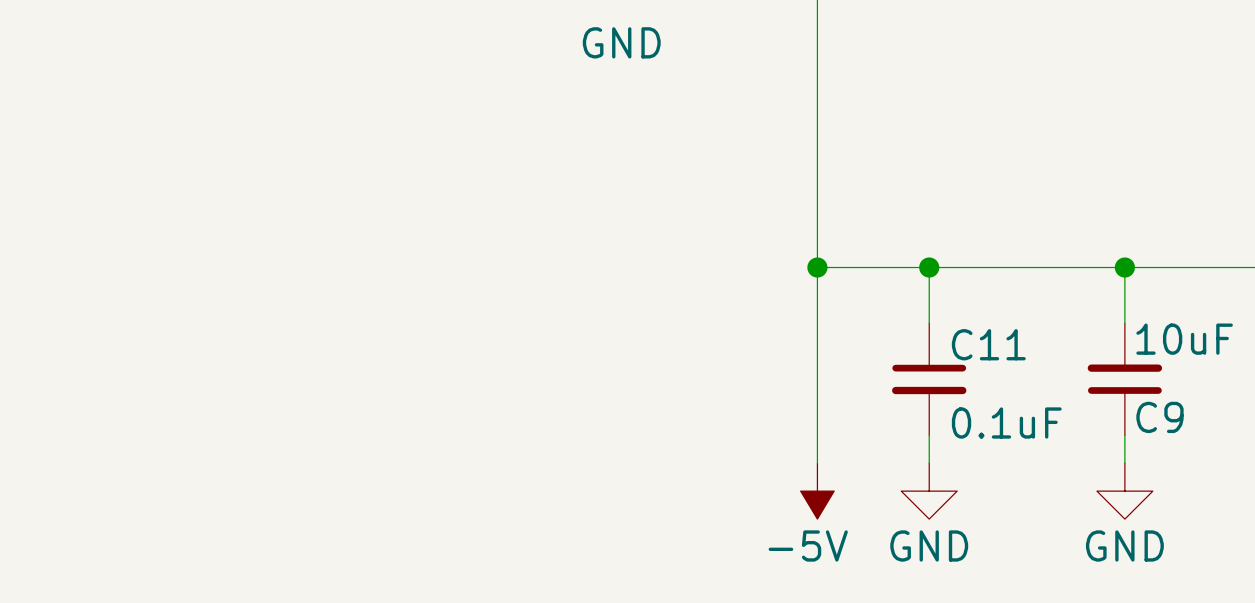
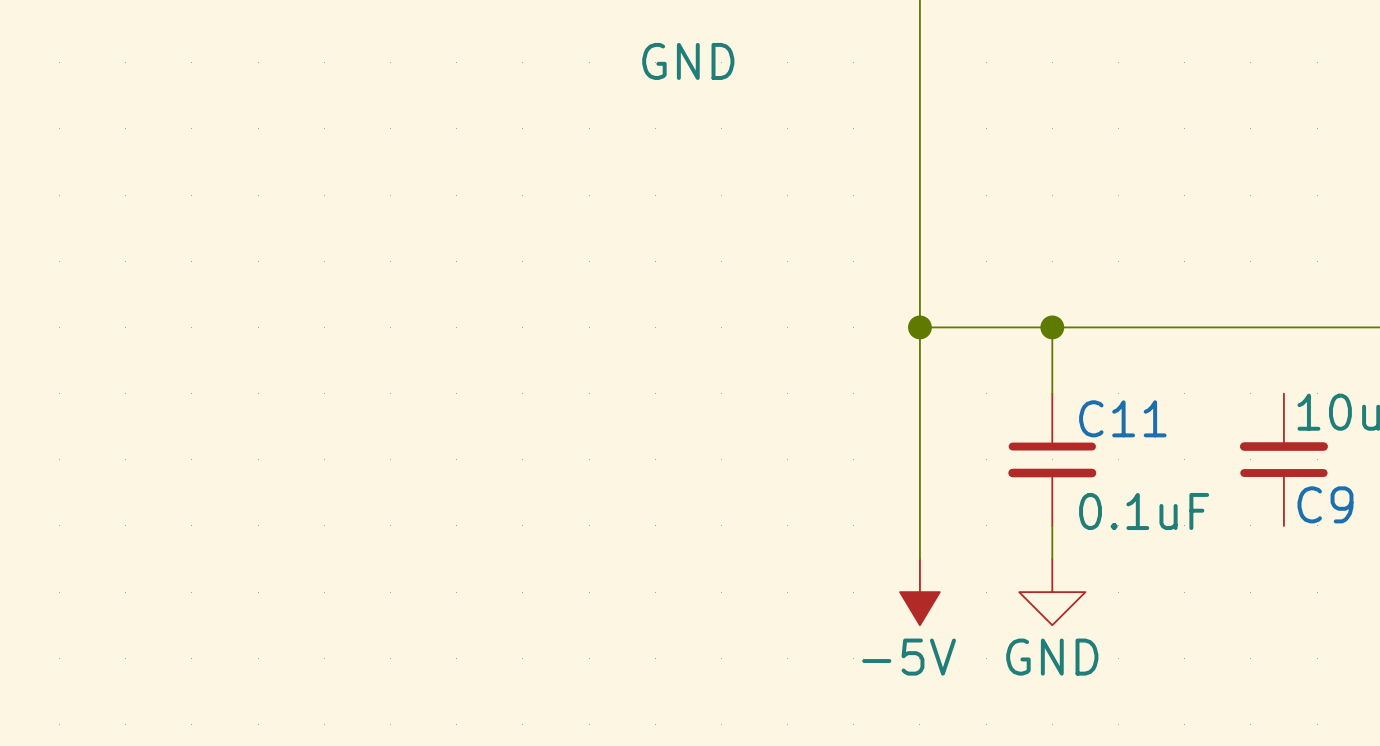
wire: (1124, 267) (1124, 323) -> none
junction: (1124, 267) -> none
wire: (1124, 435) (1124, 463) -> none
power symbol: GND (1124, 491) -> none

